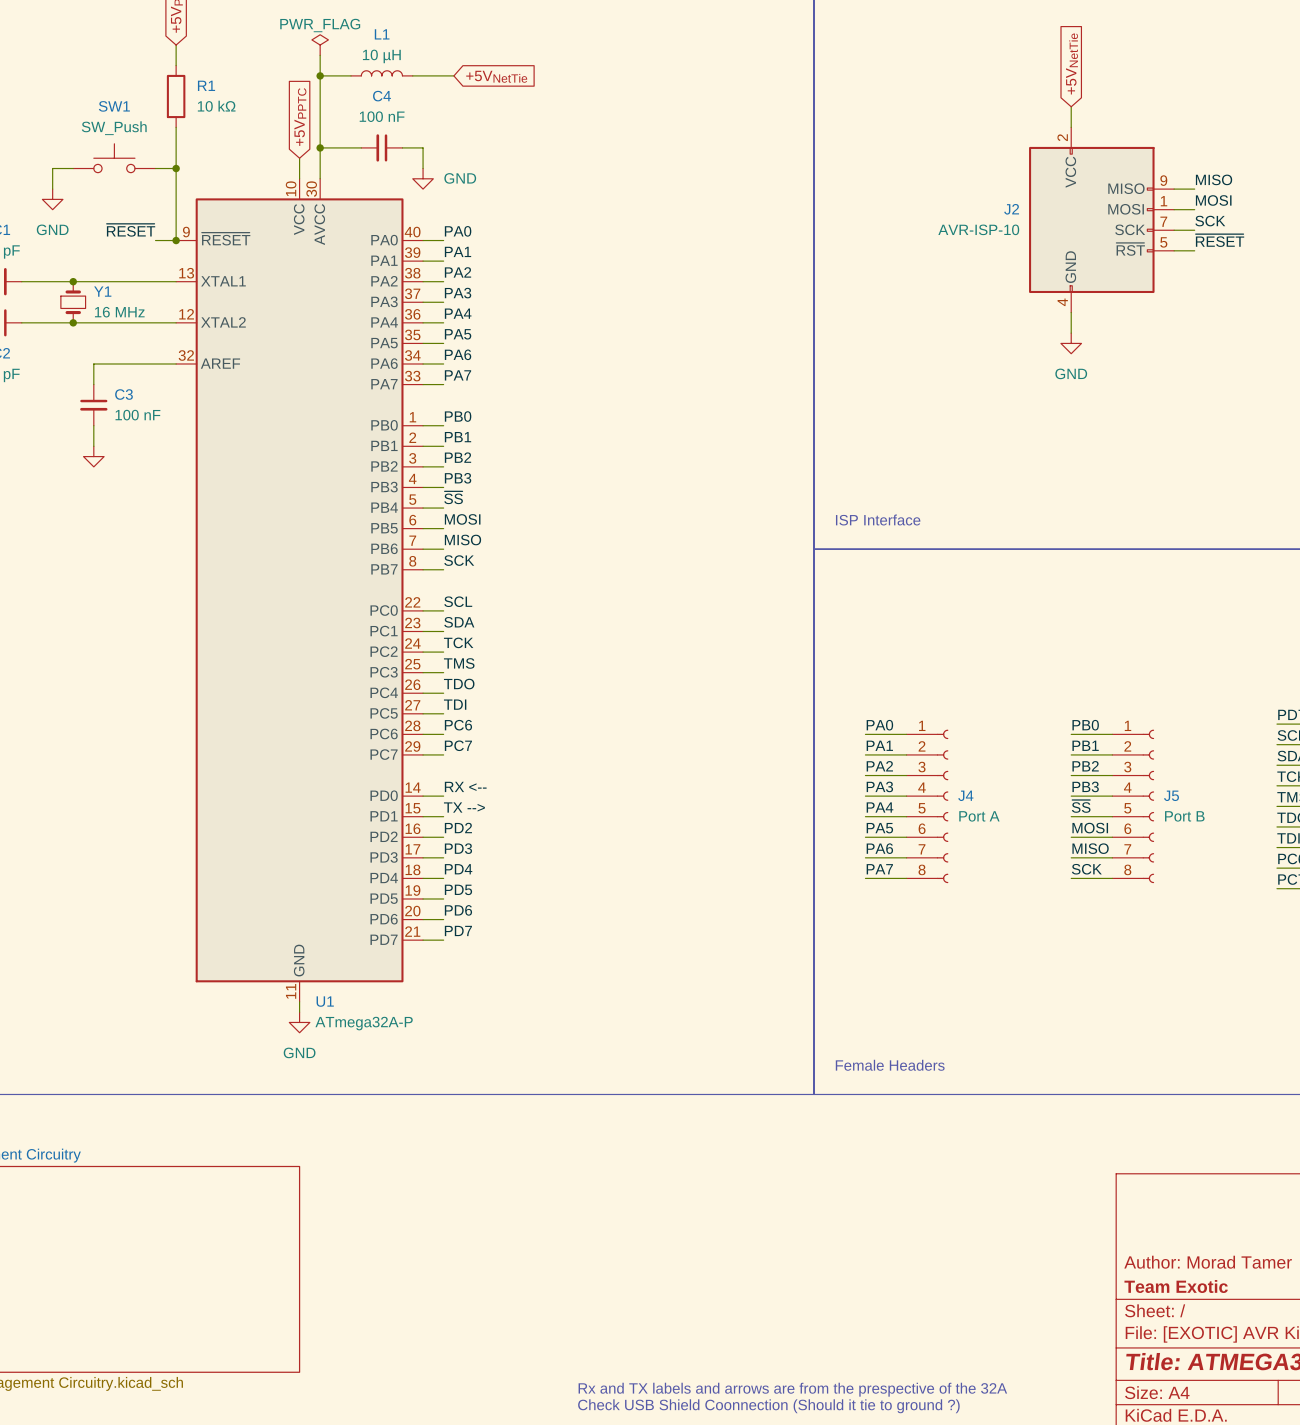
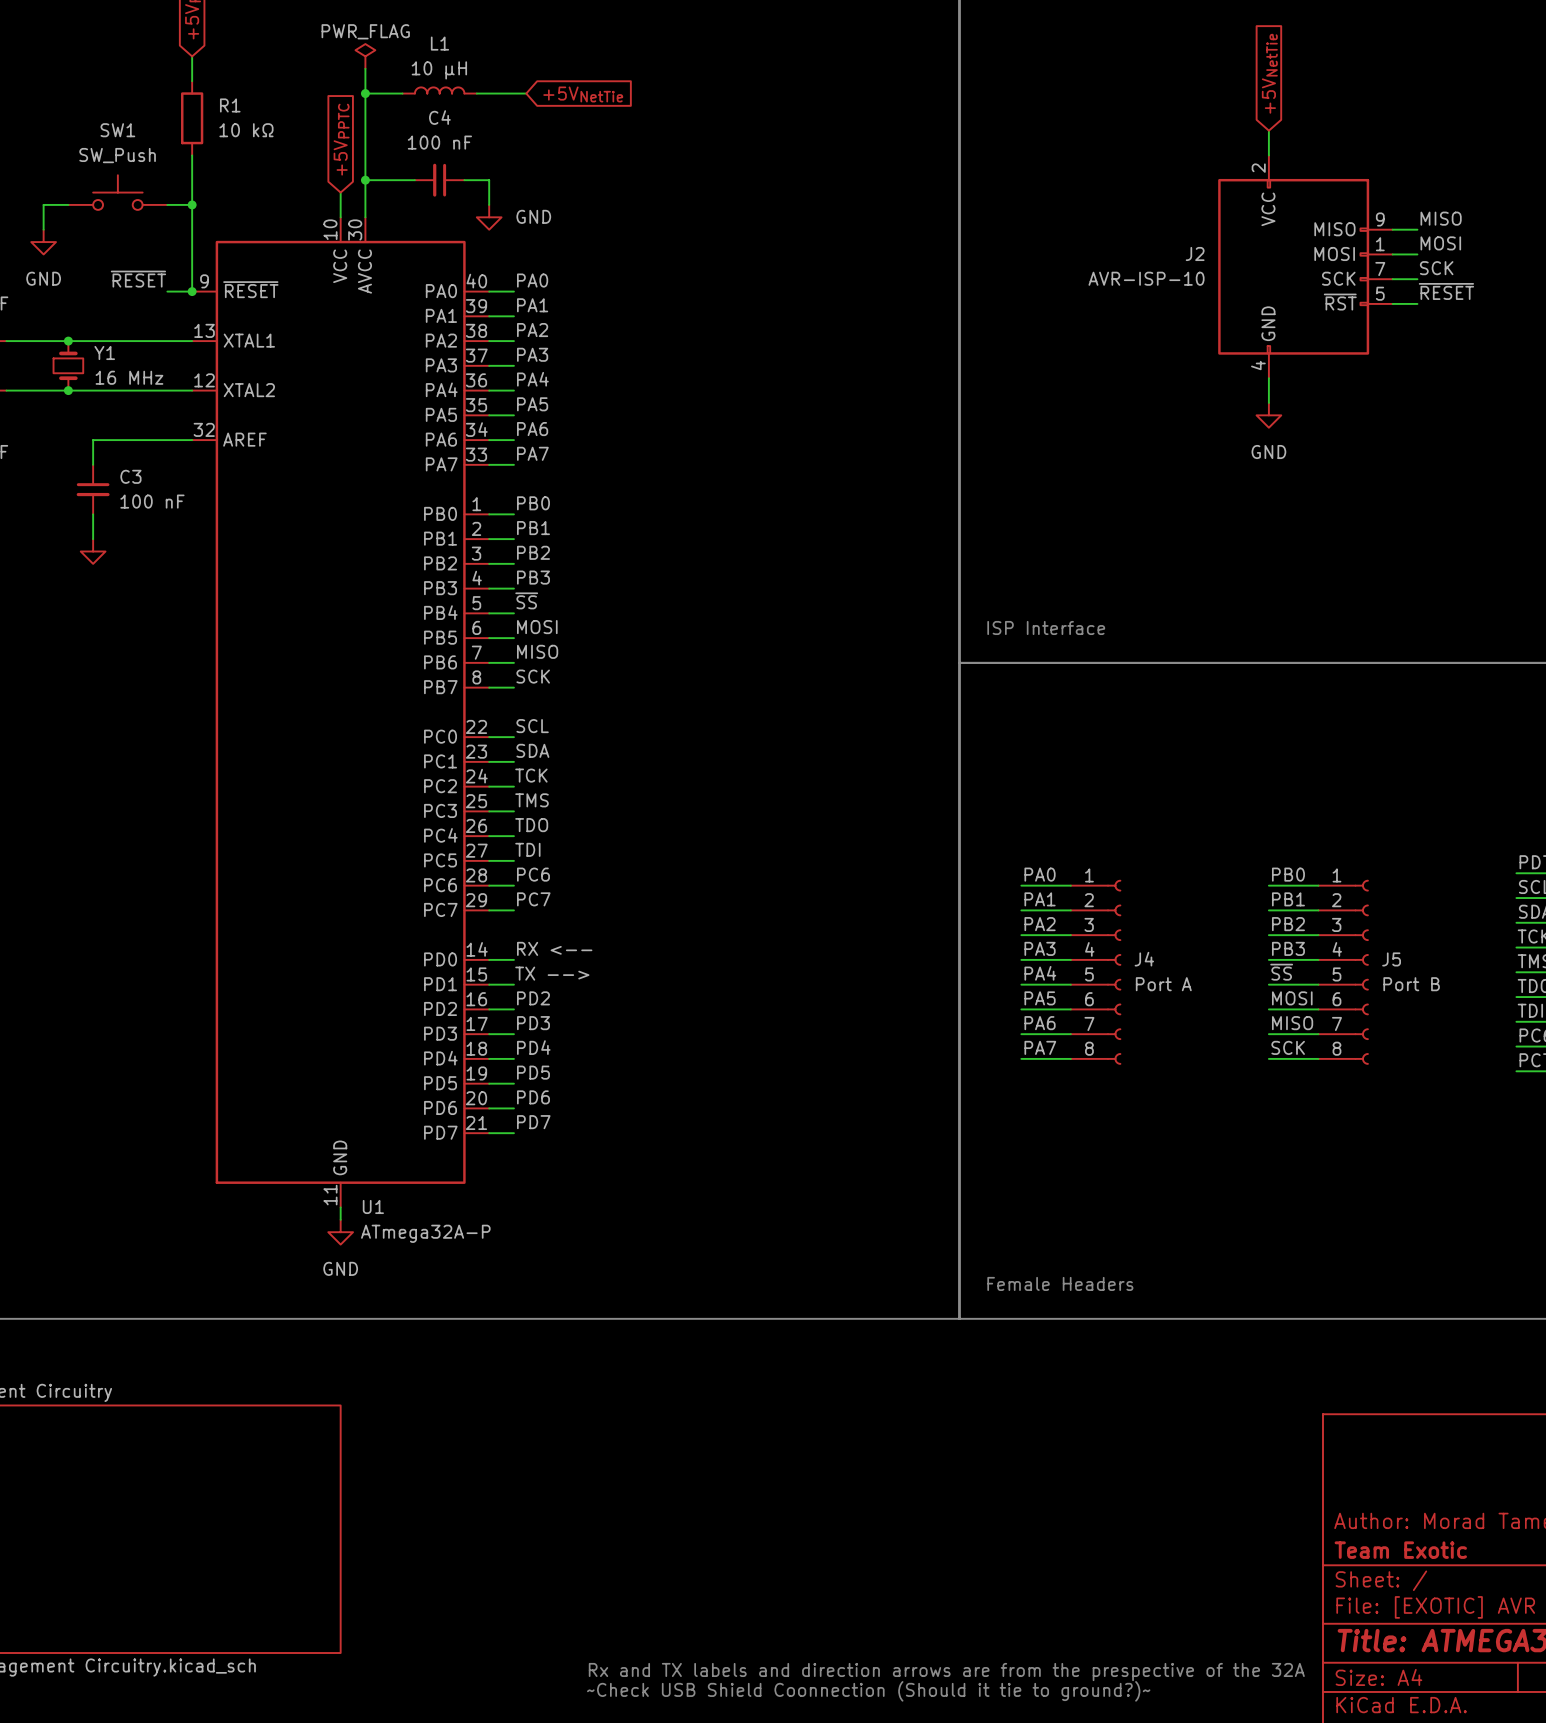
text: Rx and TX labels and arrows are from the prespective of the 32A (792, 1389) -> Rx and TX labels and direction arrows are from the prespective of the 32A (946, 1672)
text: Check USB Shield Coonnection (Should it tie to ground ?) (768, 1406) -> ~Check USB Shield Coonnection (Should it tie to ground?)~ (868, 1691)

